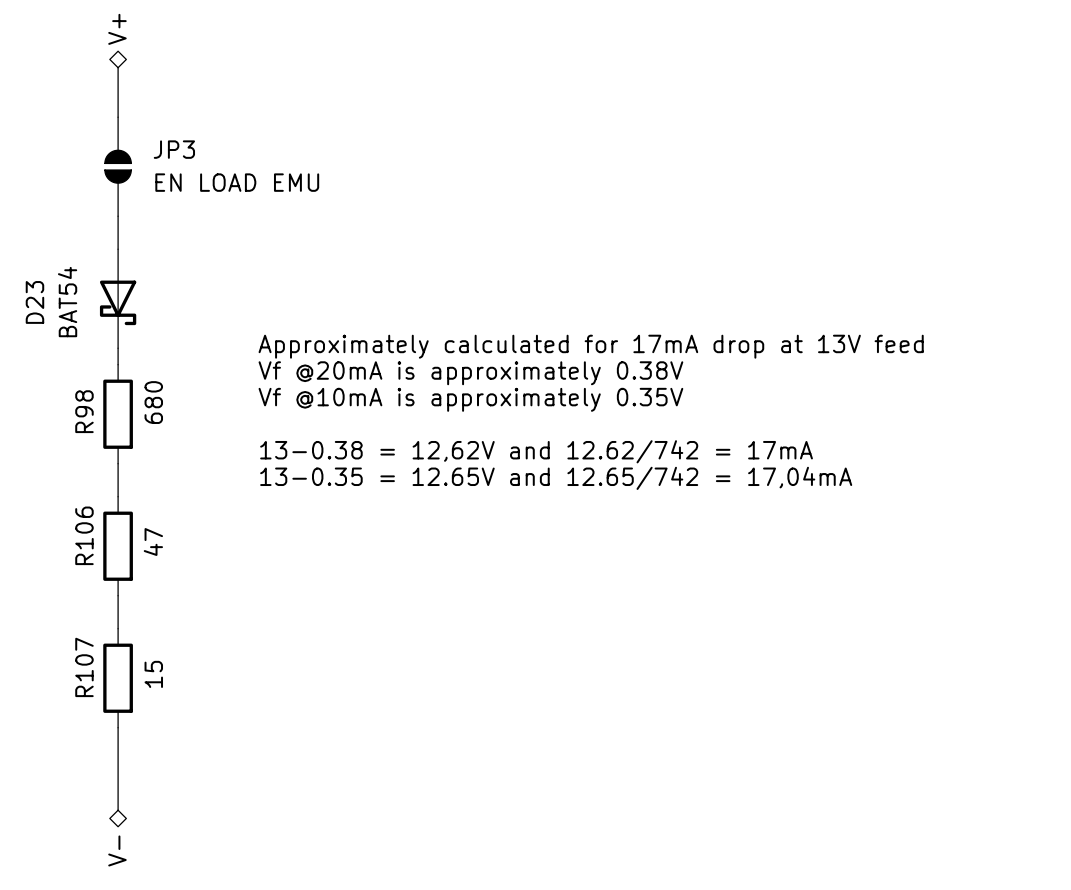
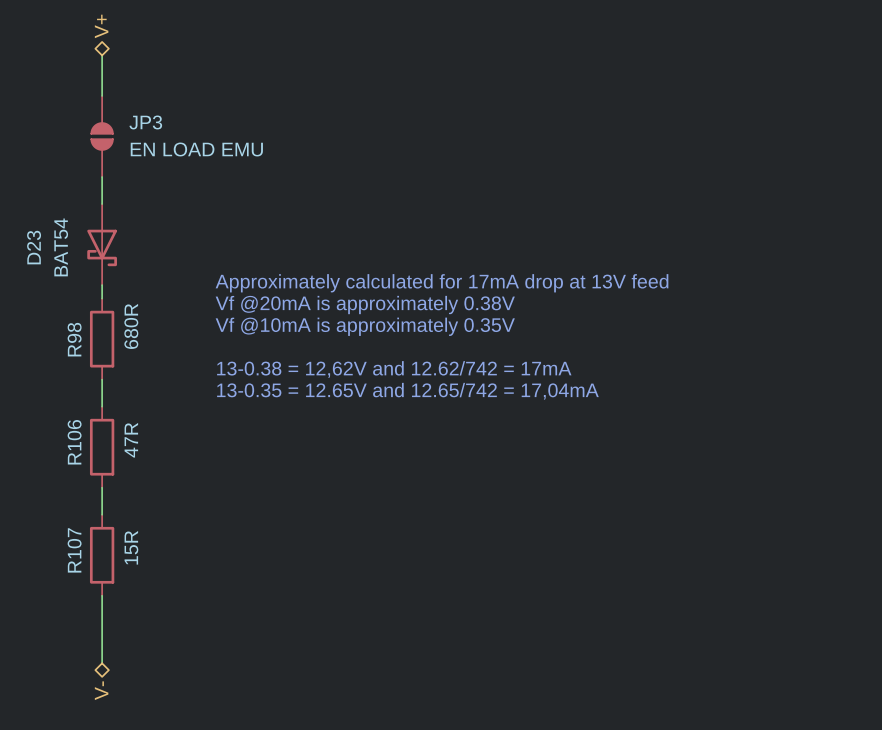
R98 value: 680 (153, 402) -> 680R (131, 326)
R106 value: 47 (153, 542) -> 47R (131, 440)
R107 value: 15 (153, 674) -> 15R (131, 547)

